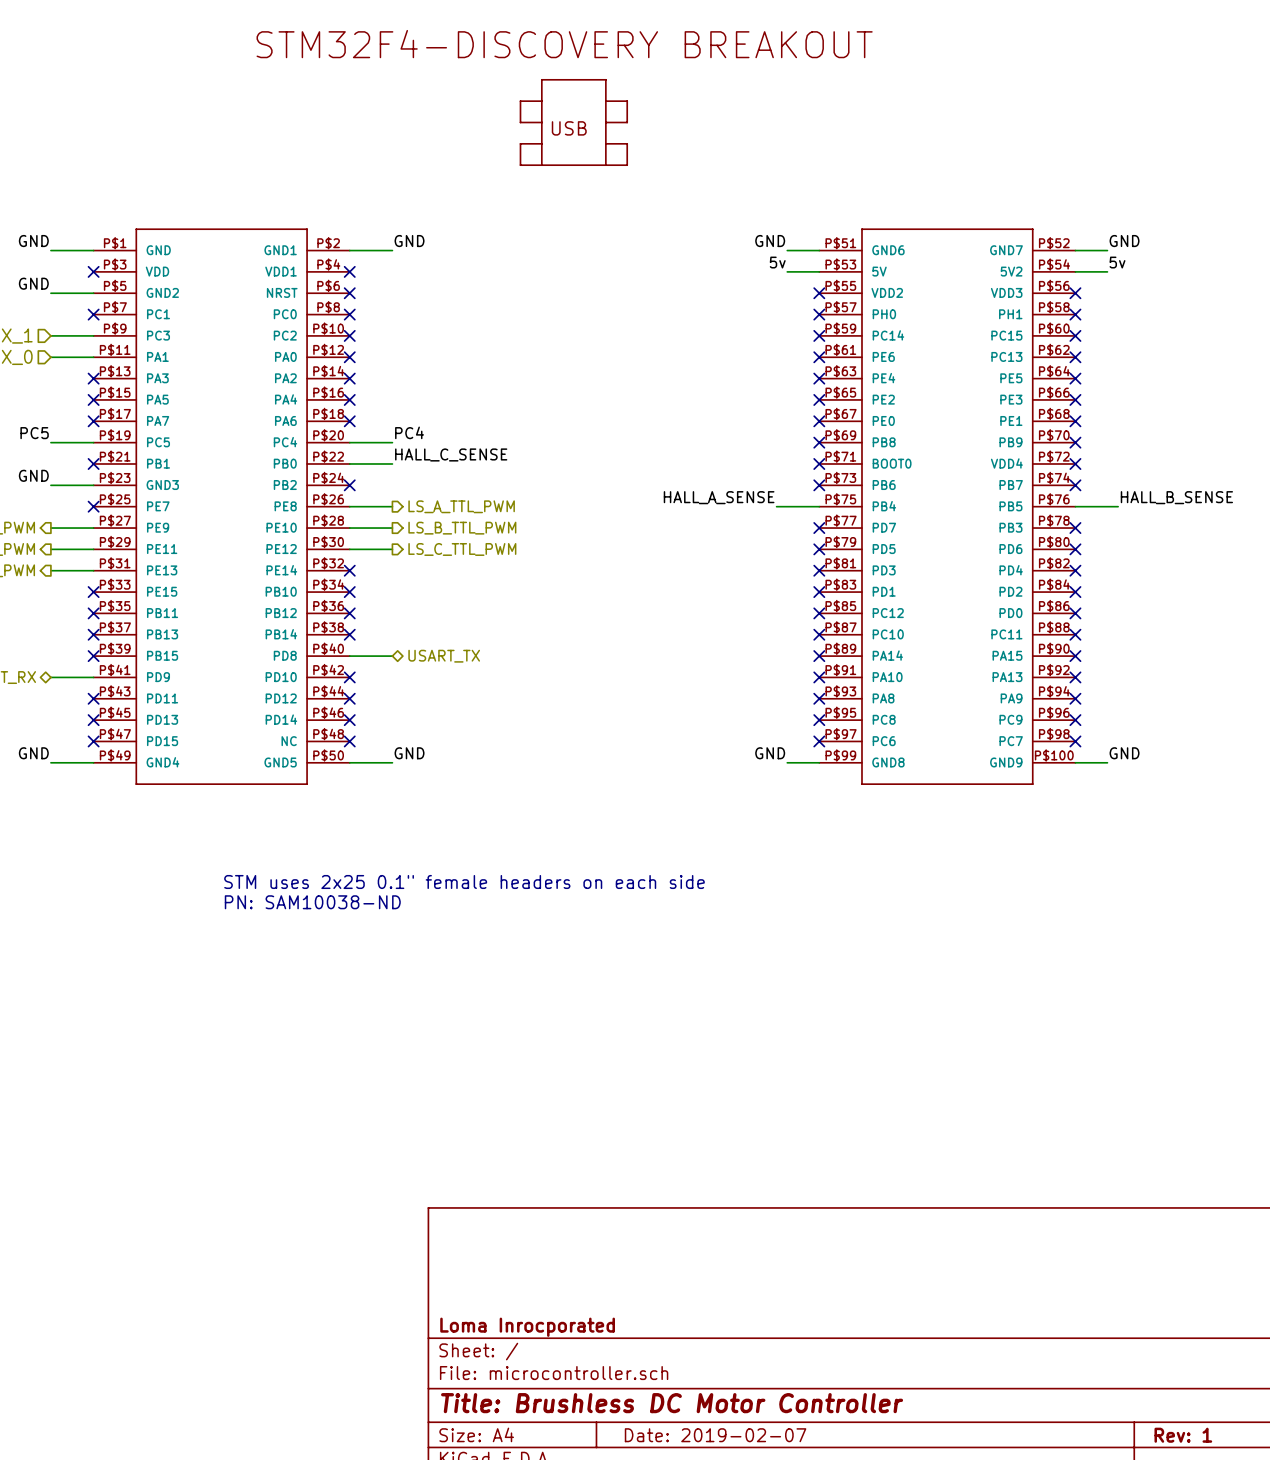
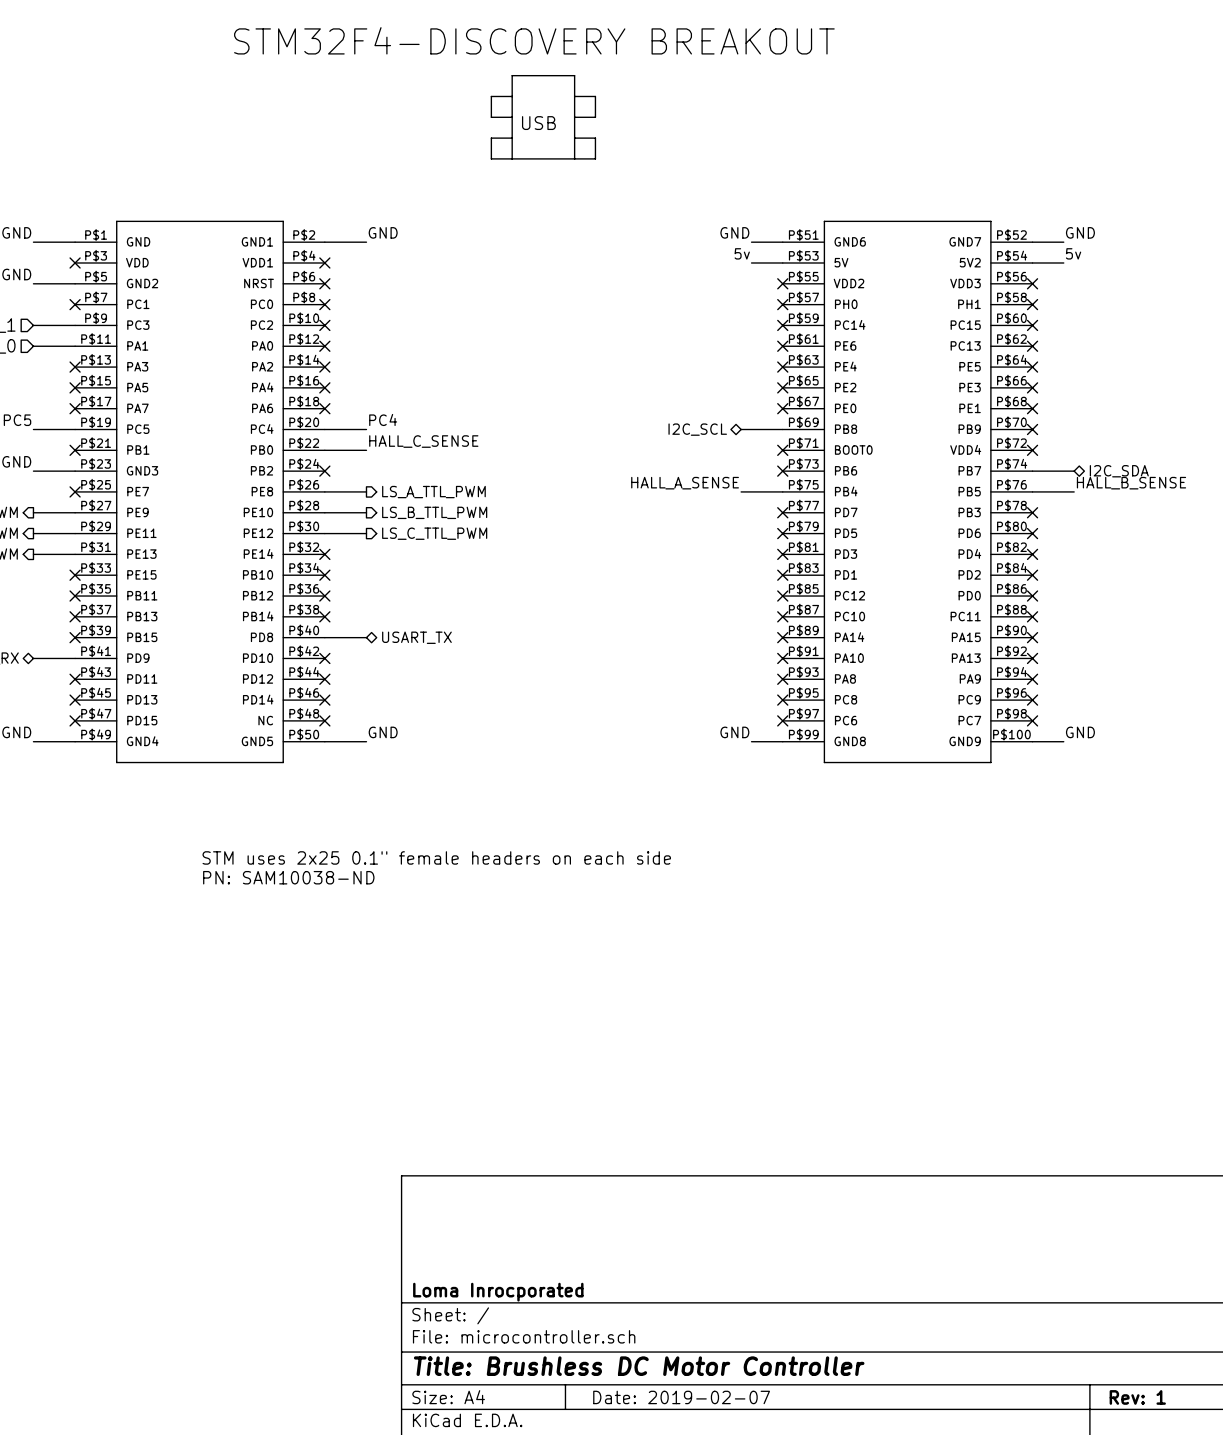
hierarchical label: none -> I2C_SCL (697, 429)
wire: none -> (741, 429) (782, 429)
no-connect mark: (819, 442) -> none
wire: none -> (1032, 471) (1074, 471)
no-connect mark: (1075, 485) -> none
hierarchical label: none -> I2C_SDA (1119, 471)

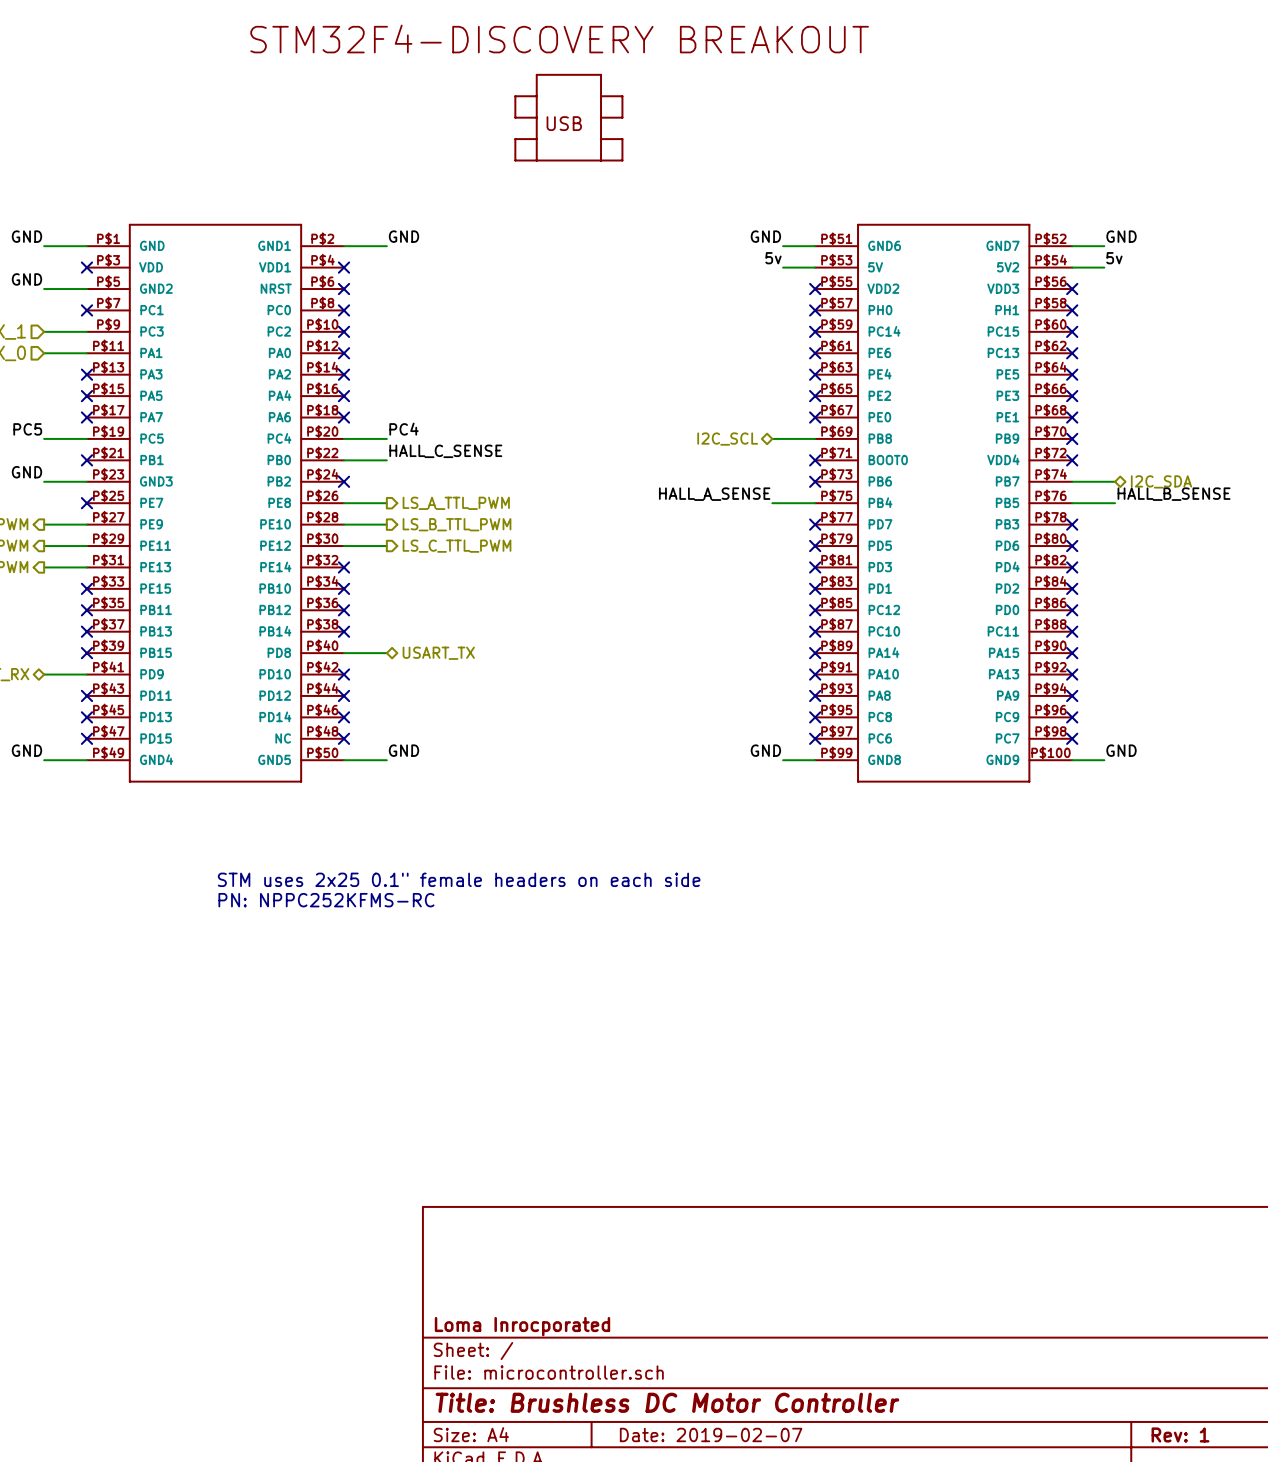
text: PN: SAM10038-ND (288, 877) -> PN: NPPC252KFMS-RC (326, 900)

